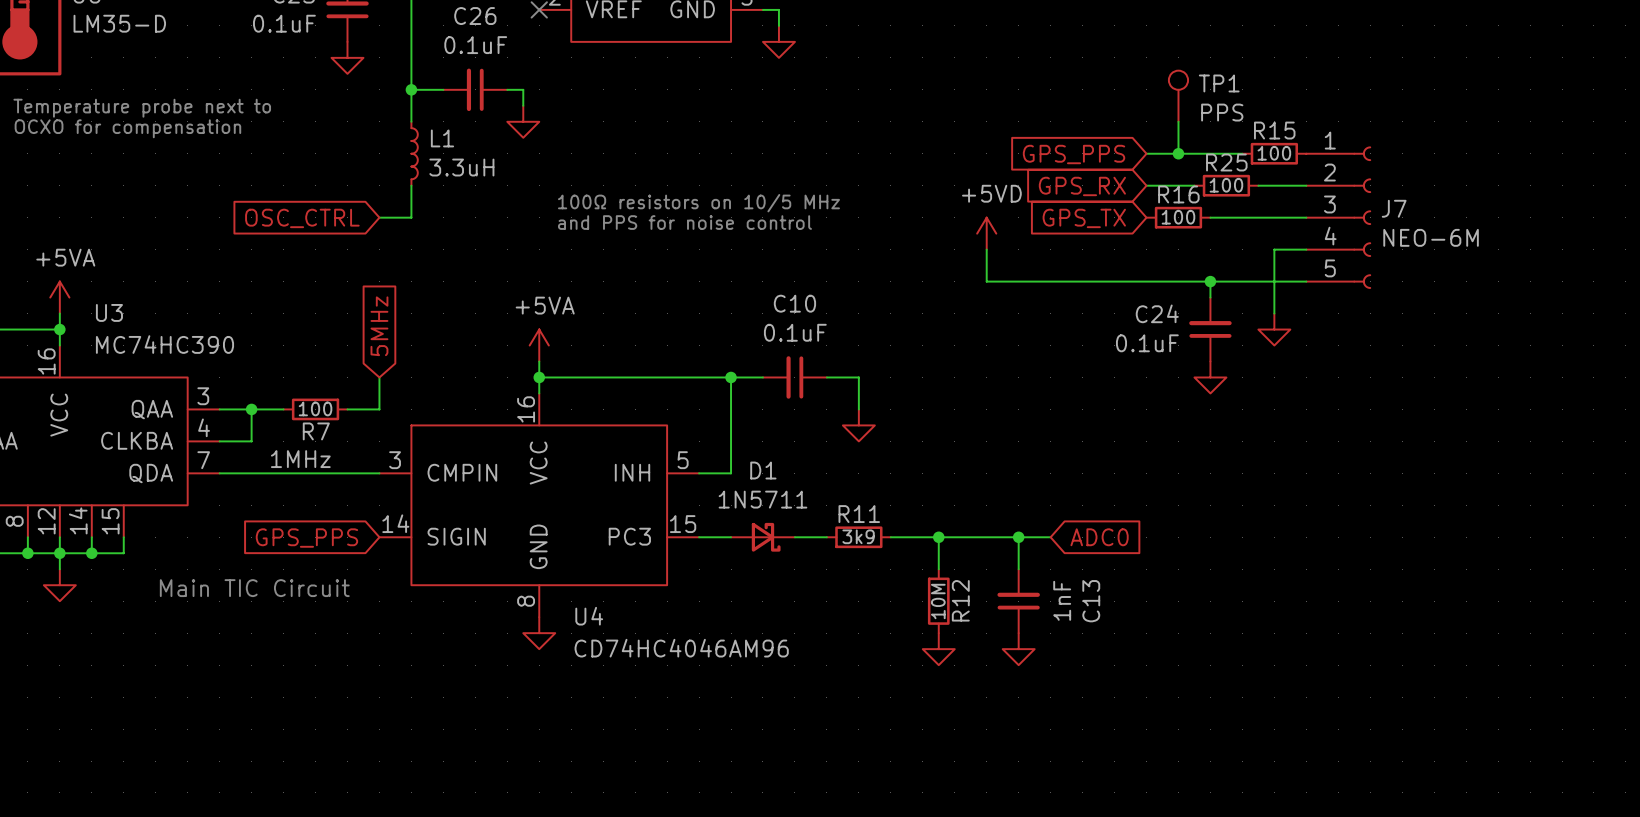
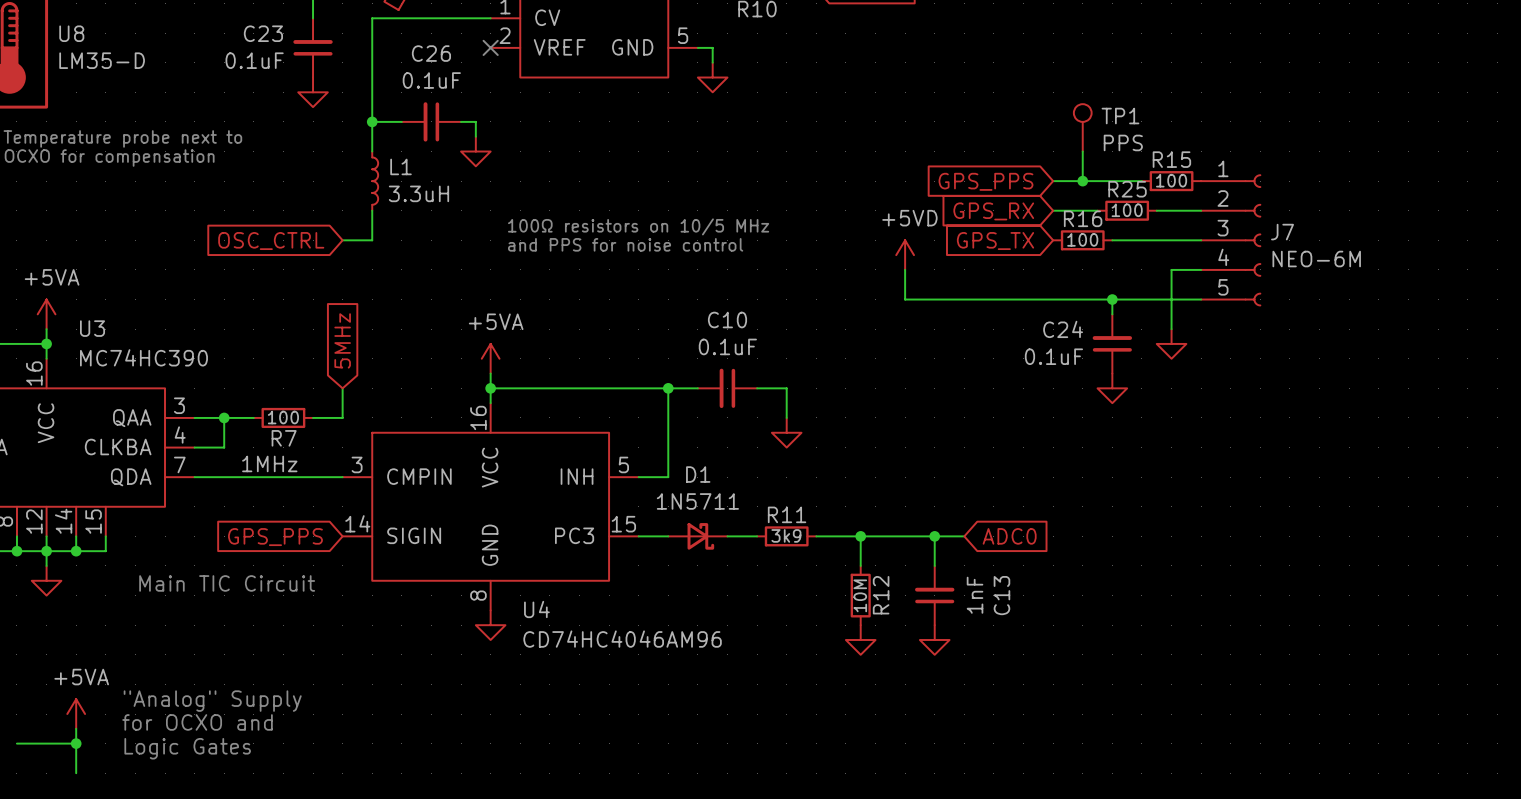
text: none -> "Analog" Supply (212, 701)
power symbol: none -> +5VA (76, 714)
text: none -> for OCXO and (197, 722)
wire: none -> (76, 728) (76, 773)
wire: none -> (16, 743) (76, 743)
junction: none -> (76, 743)
text: none -> Logic Gates (187, 748)

